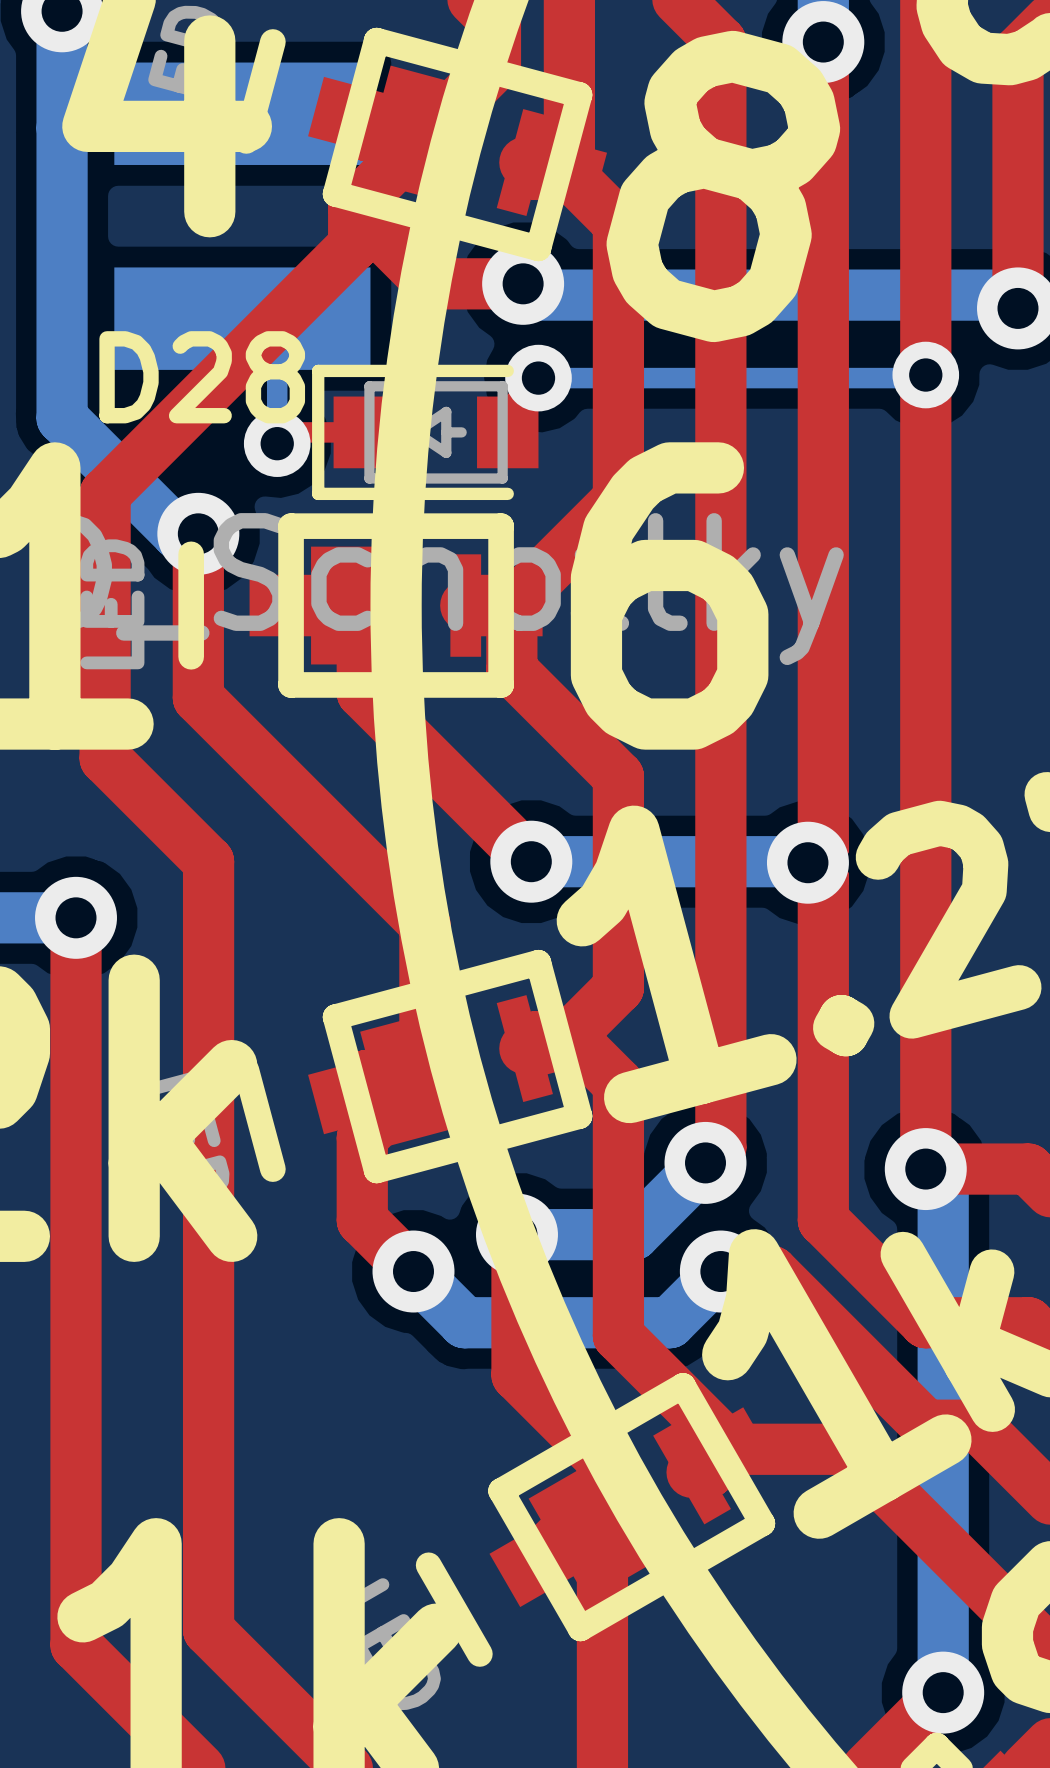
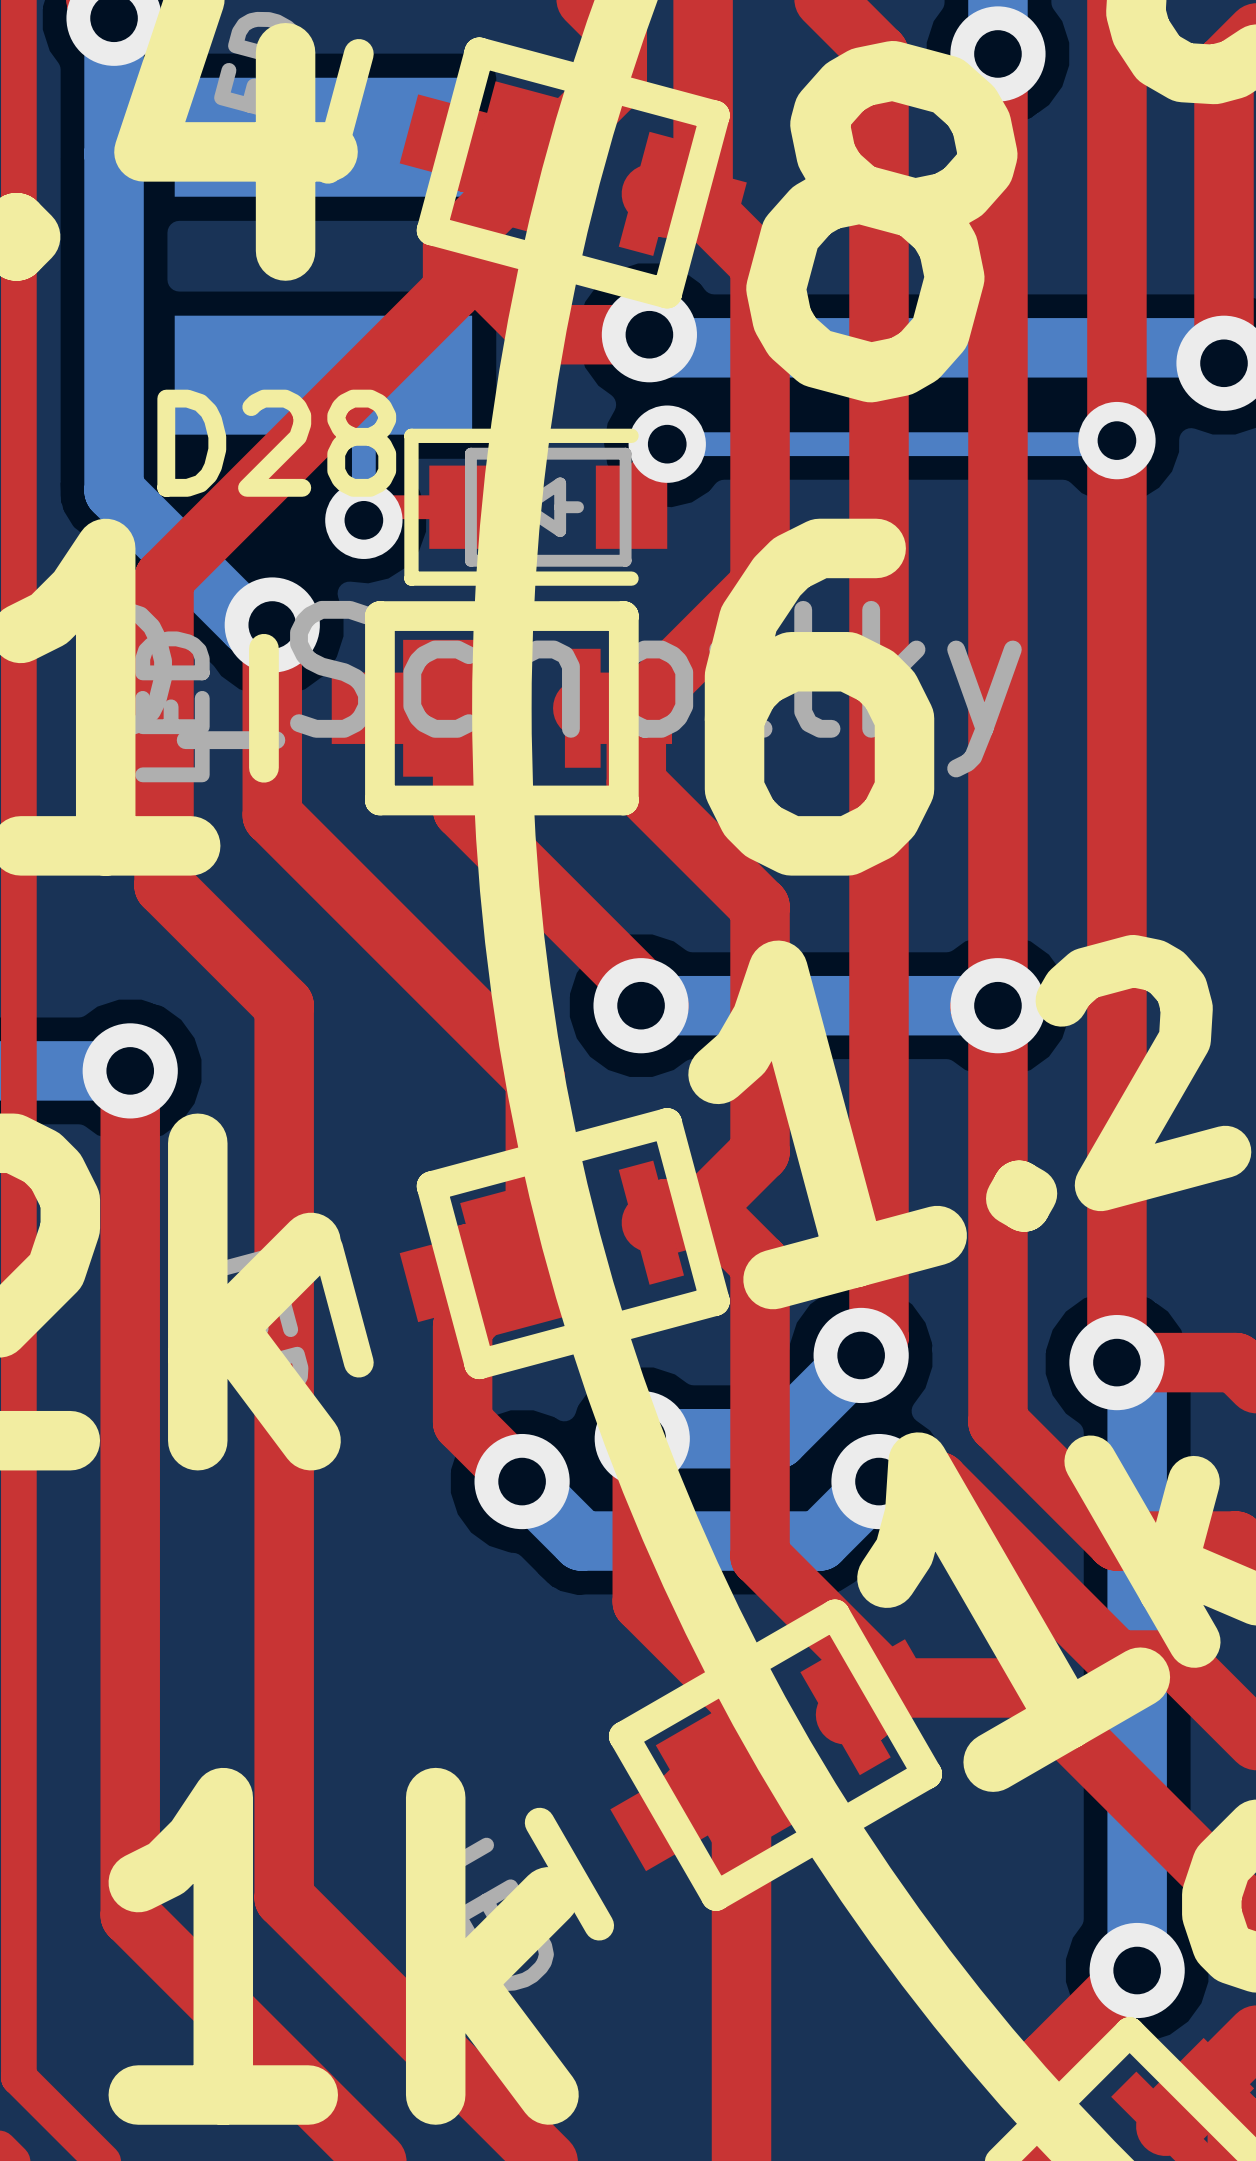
via position: (531, 861) -> (641, 1005)
via position: (807, 862) -> (997, 1005)

